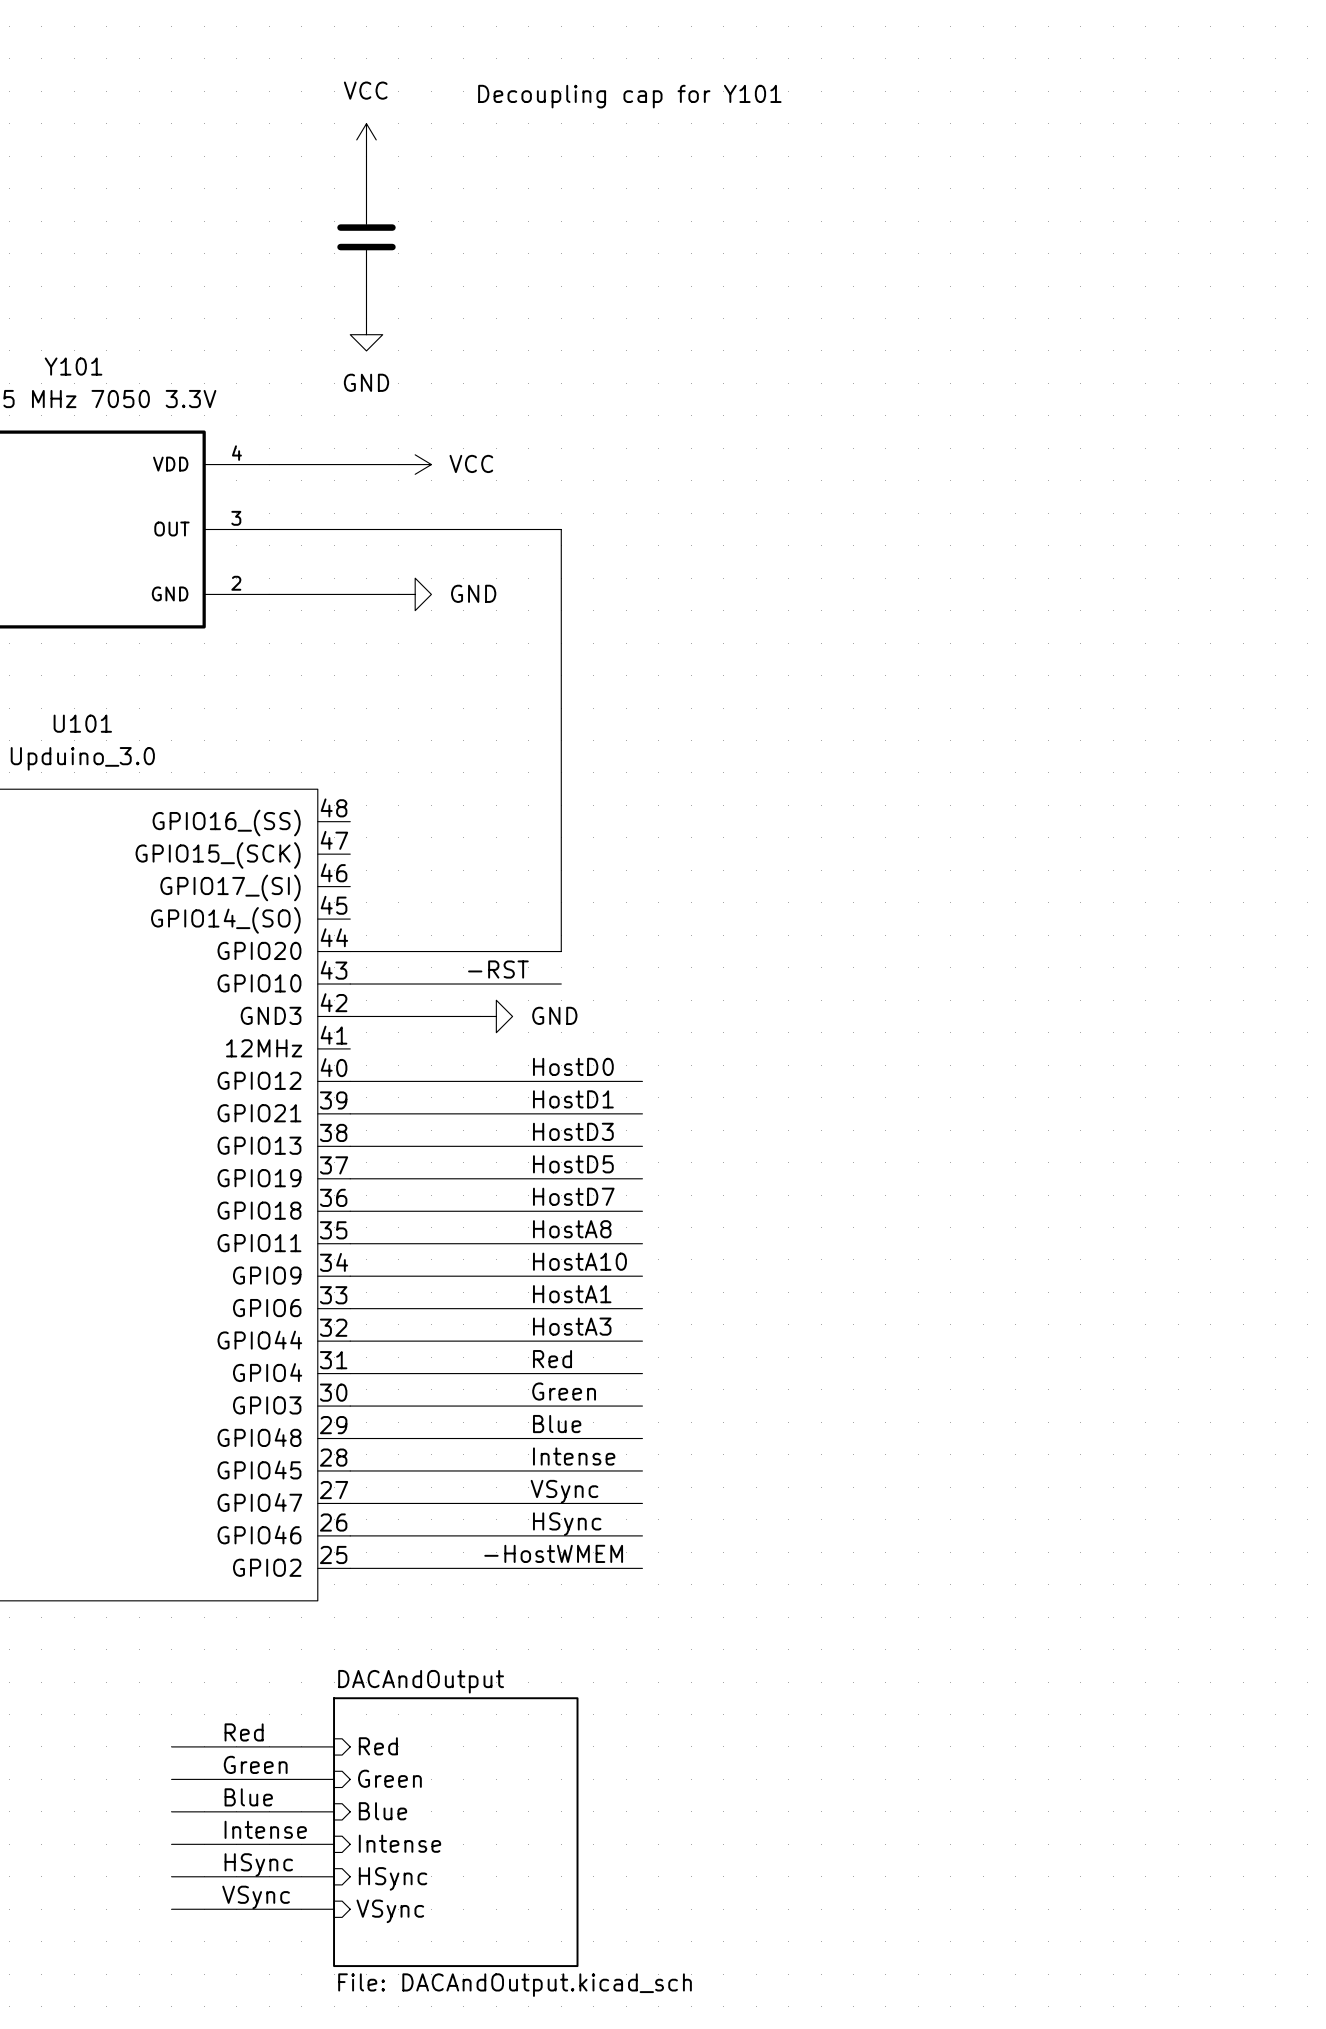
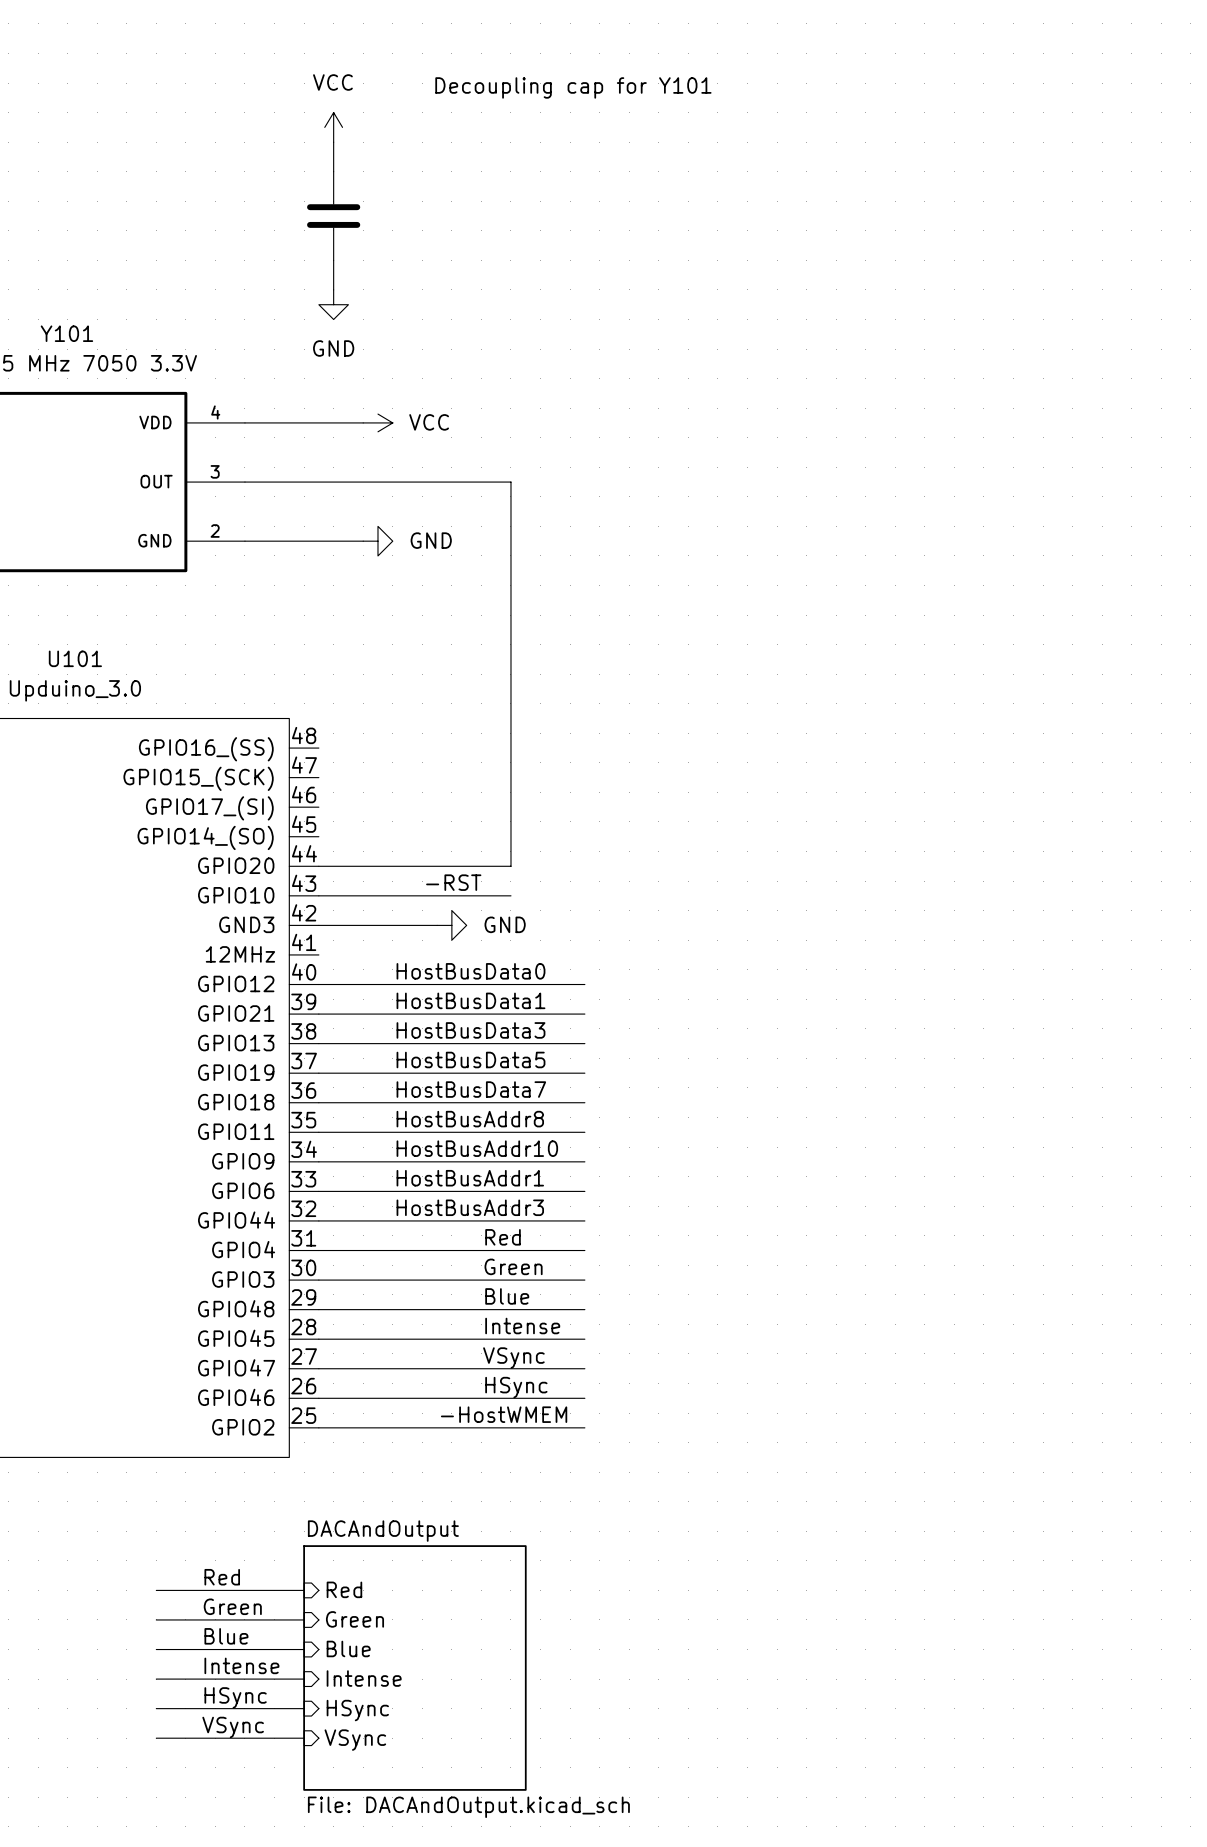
label: HostD0 (573, 1066) -> HostBusData0 (470, 971)
label: HostD1 (573, 1099) -> HostBusData1 (470, 1000)
label: HostD3 (573, 1131) -> HostBusData3 (470, 1030)
label: HostD5 (573, 1164) -> HostBusData5 (470, 1059)
label: HostD7 (573, 1196) -> HostBusData7 (471, 1089)
label: HostA8 (572, 1229) -> HostBusAddr8 (470, 1119)
label: none -> HostBusAddr10 (477, 1148)
label: HostA10 (579, 1261) -> none
label: none -> HostBusAddr1 (470, 1178)
label: HostA1 (572, 1294) -> none
label: HostA3 (572, 1326) -> HostBusAddr3 (470, 1207)

